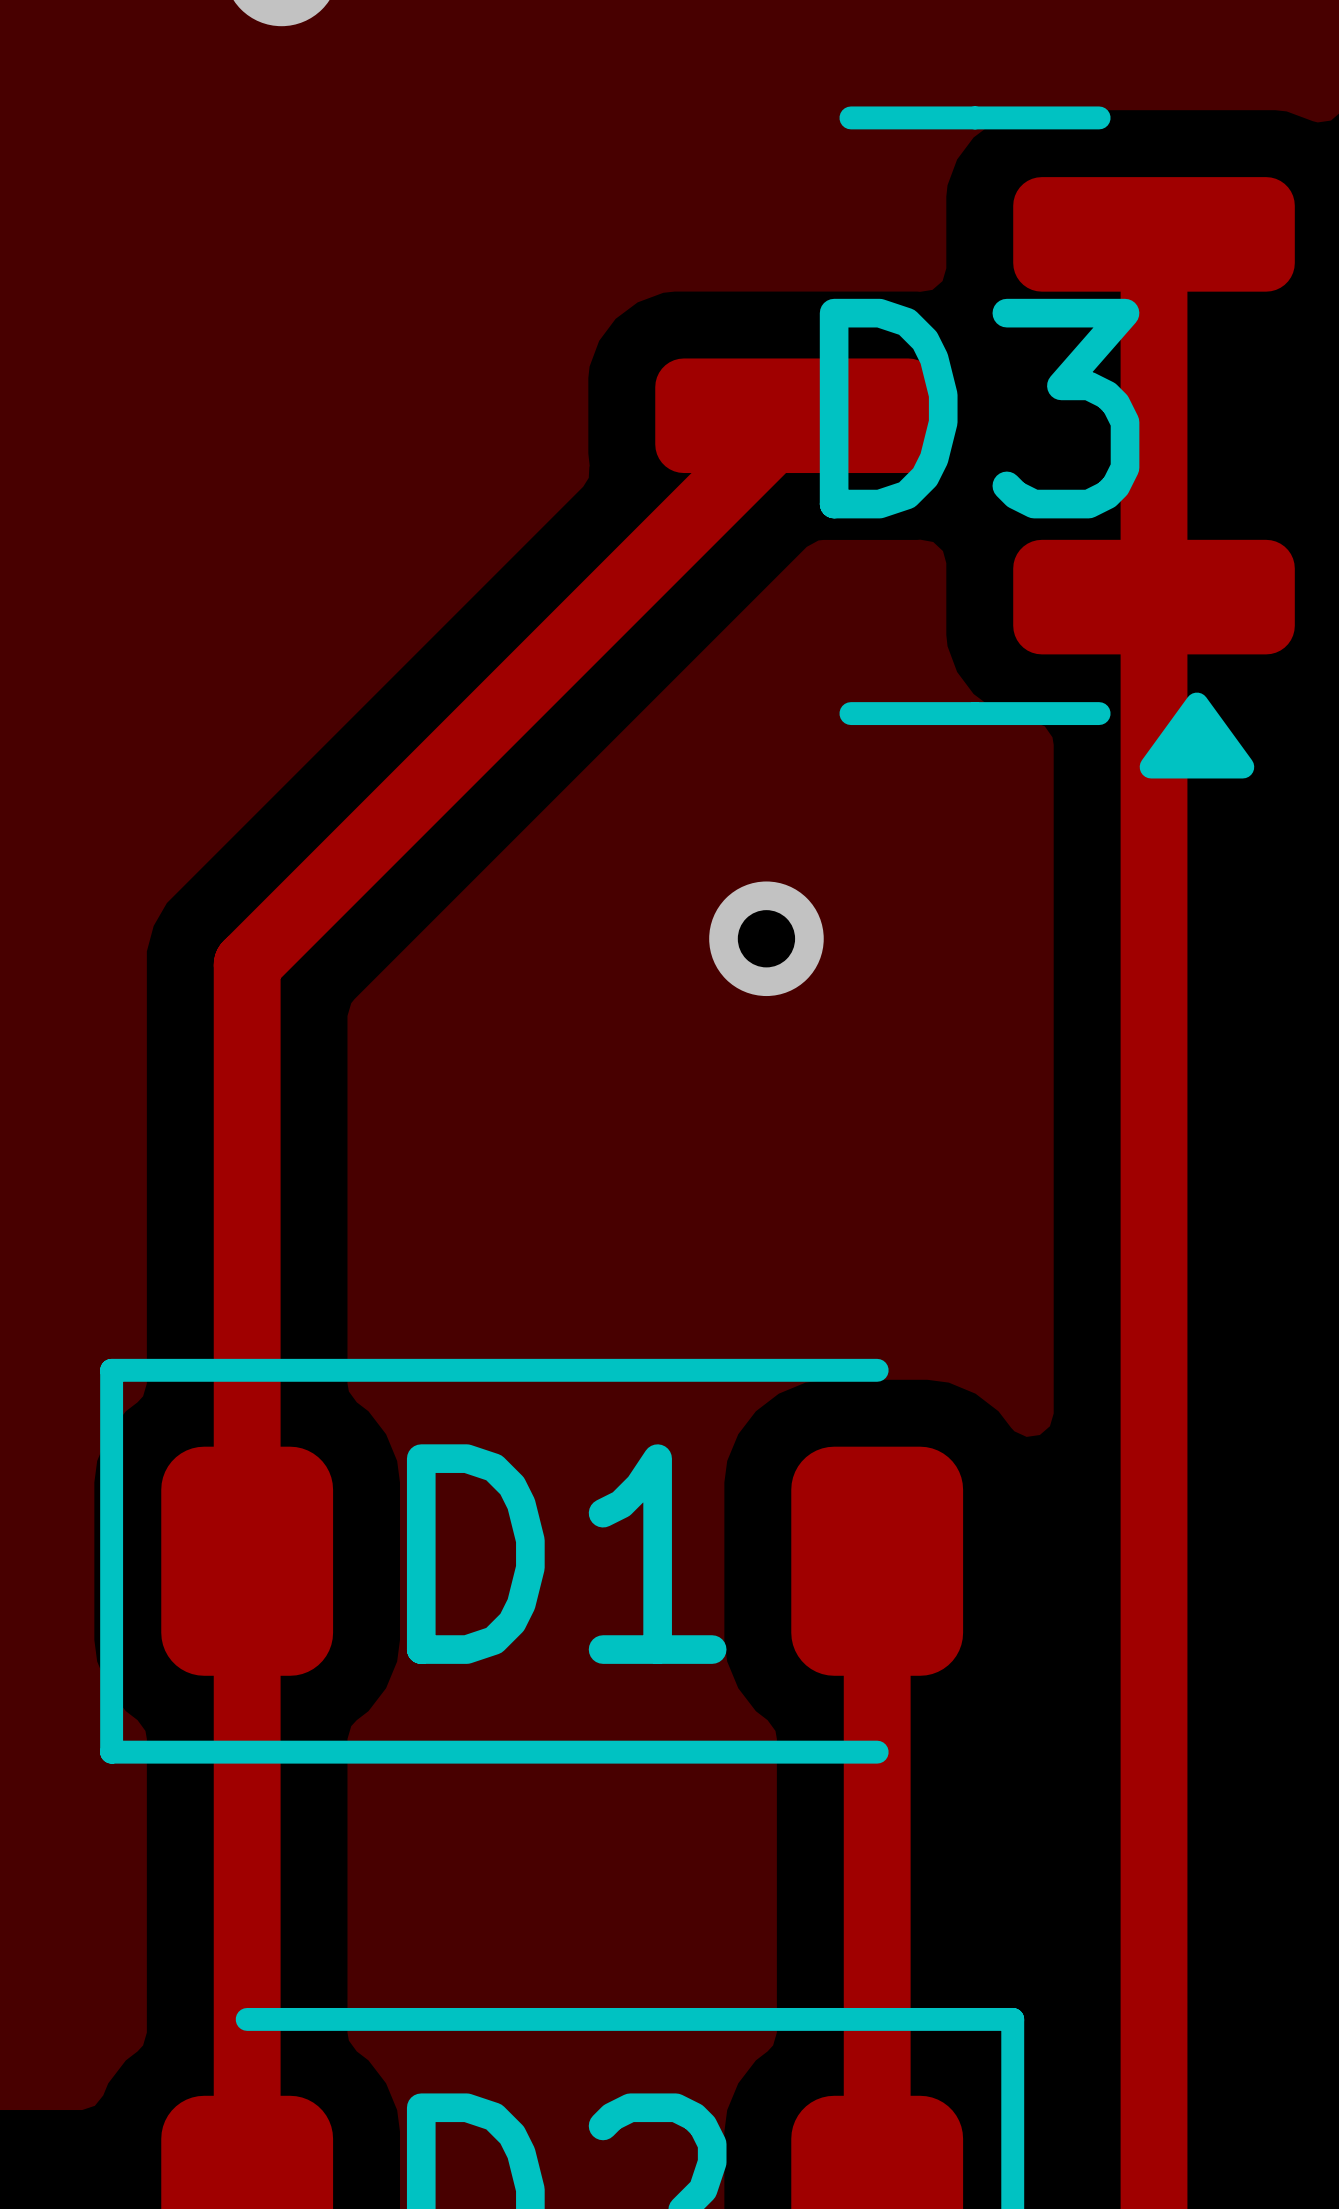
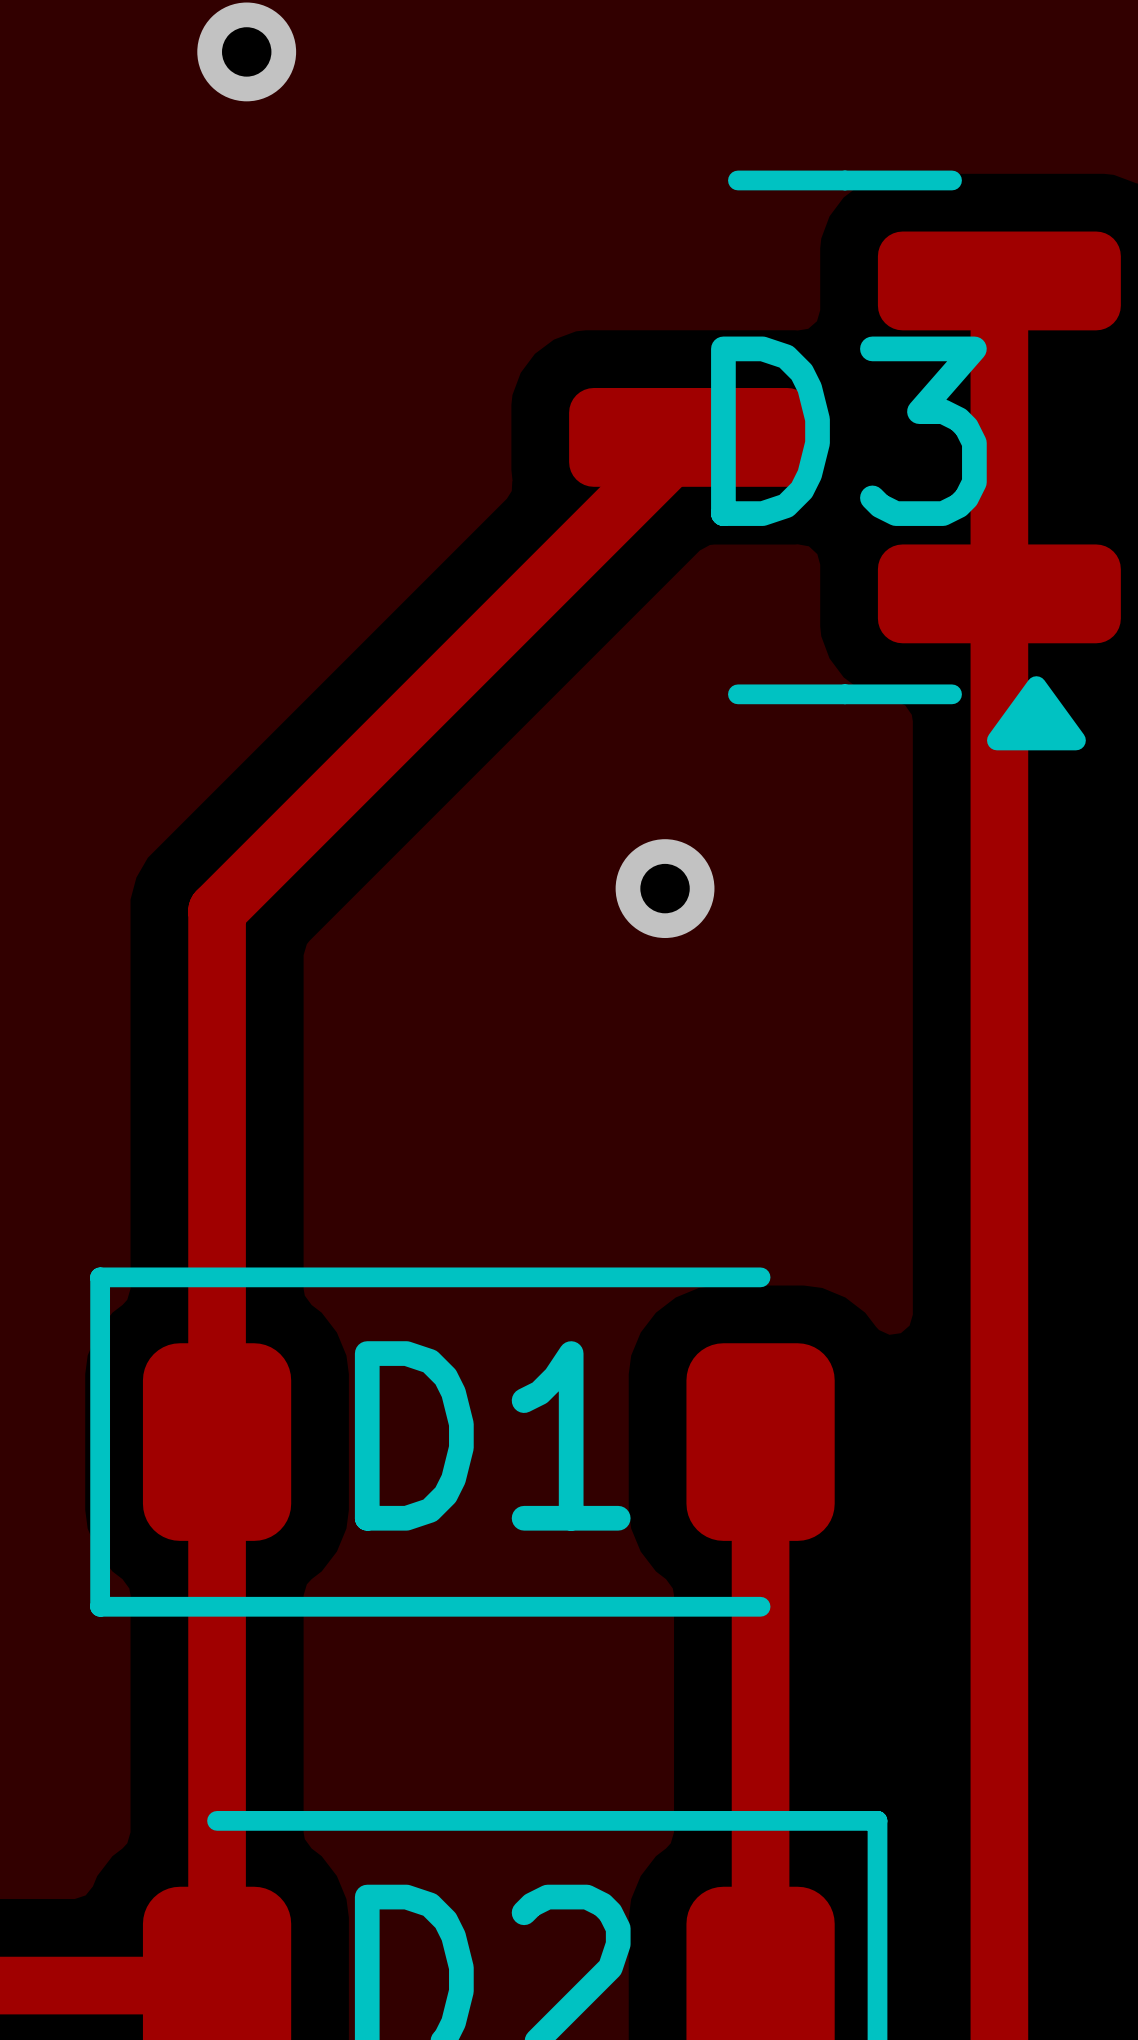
D1 position: (531, 1561) -> (462, 1442)

